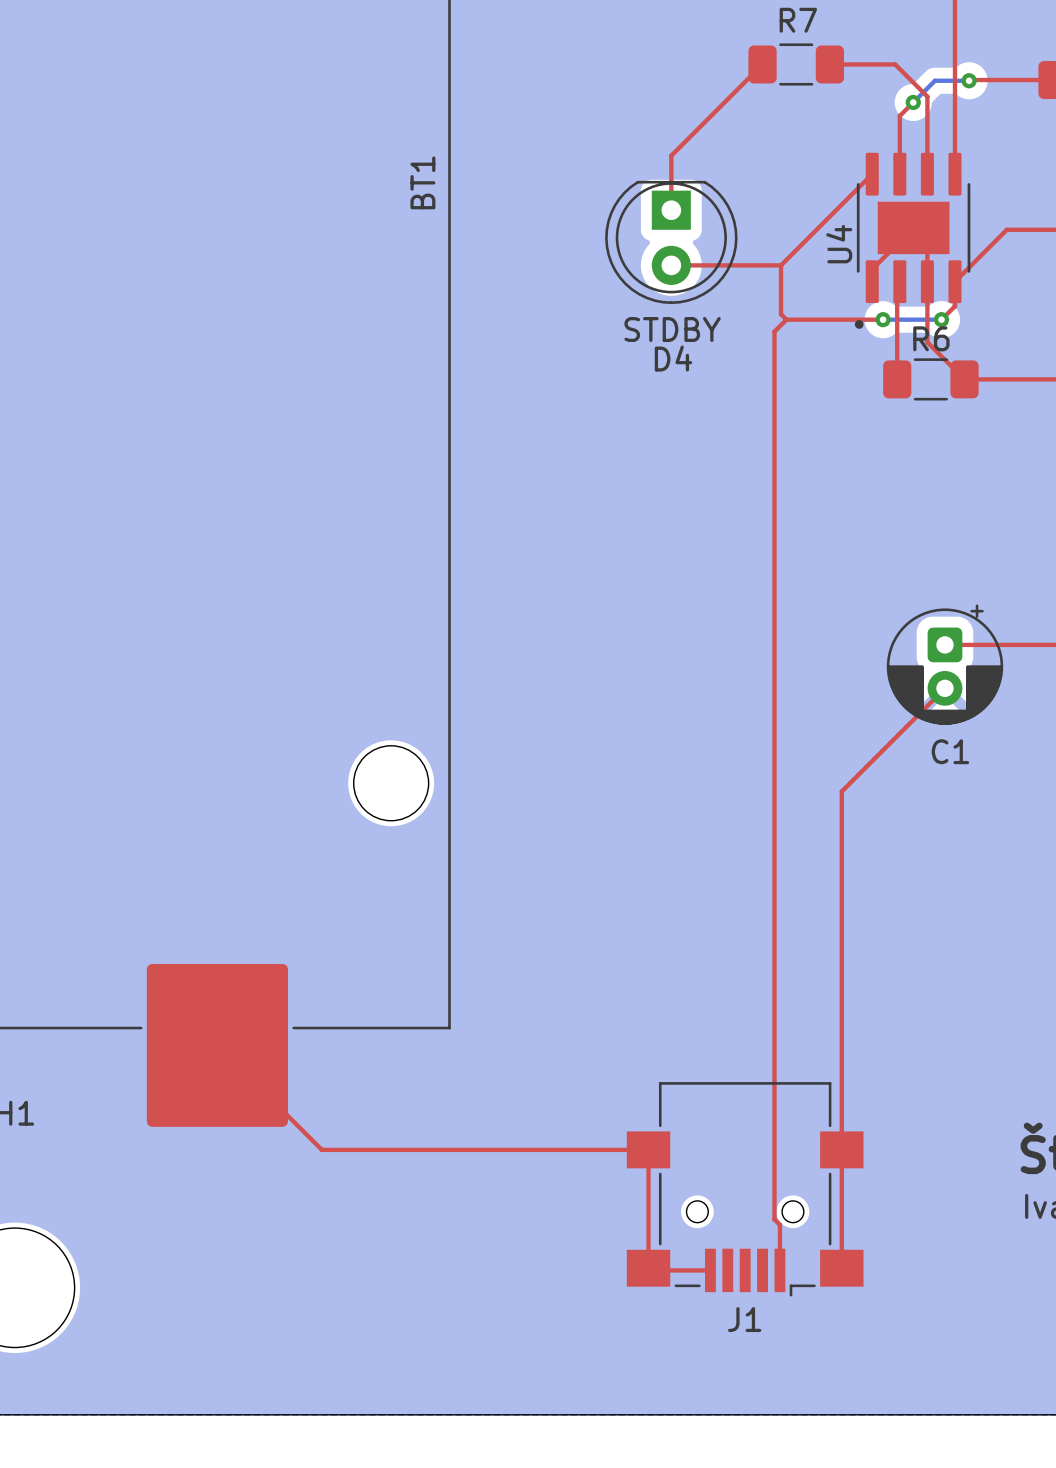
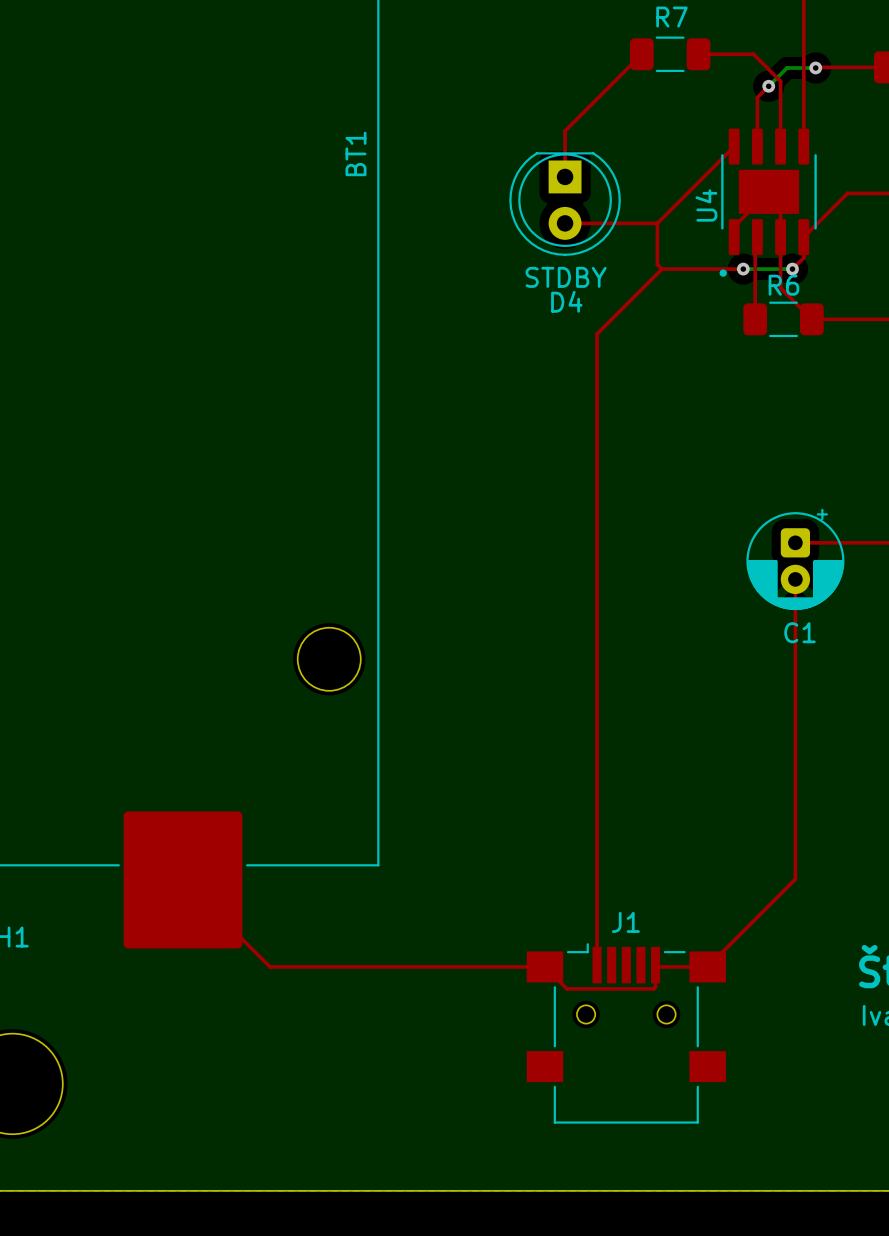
top track: (774, 331) (774, 1219) (779, 1224) (779, 1270) -> (651, 279) (597, 333) (597, 965)
top track: (944, 688) (841, 791) (841, 1268) -> (795, 579) (795, 879) (707, 966) (657, 966) (655, 965) (655, 987) (653, 988) (566, 988) (544, 966) (270, 966)
top track: (320, 1148) (648, 1149) (648, 1268) (650, 1270) (710, 1270) -> none
J1 rotation: 0° (745, 1189) -> 180° (626, 1033)

